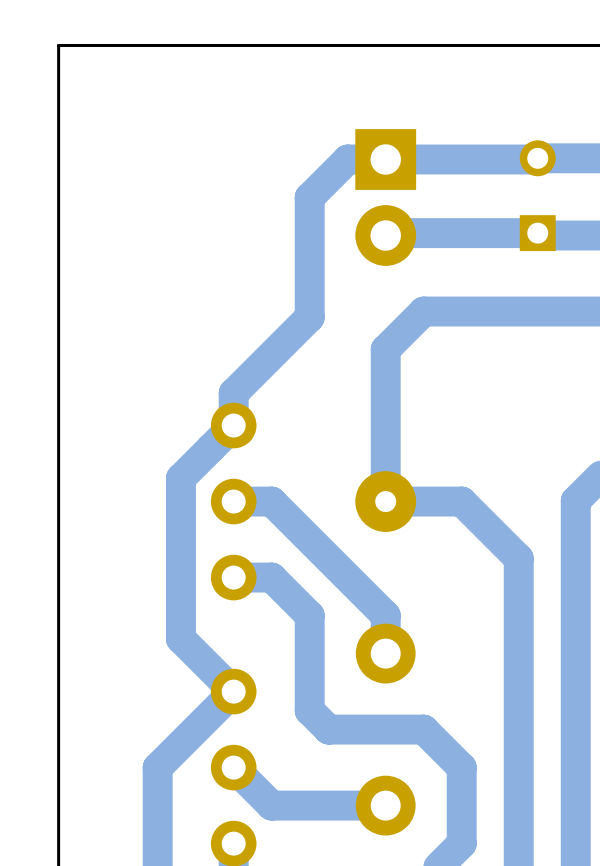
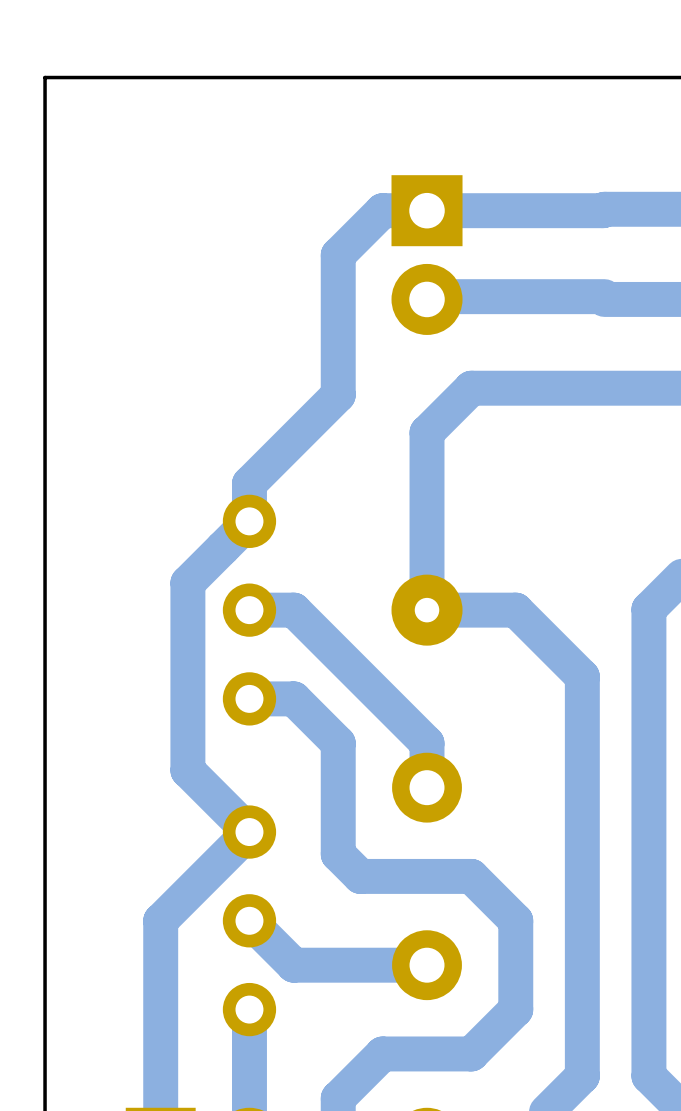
part: (537, 195) -> none

